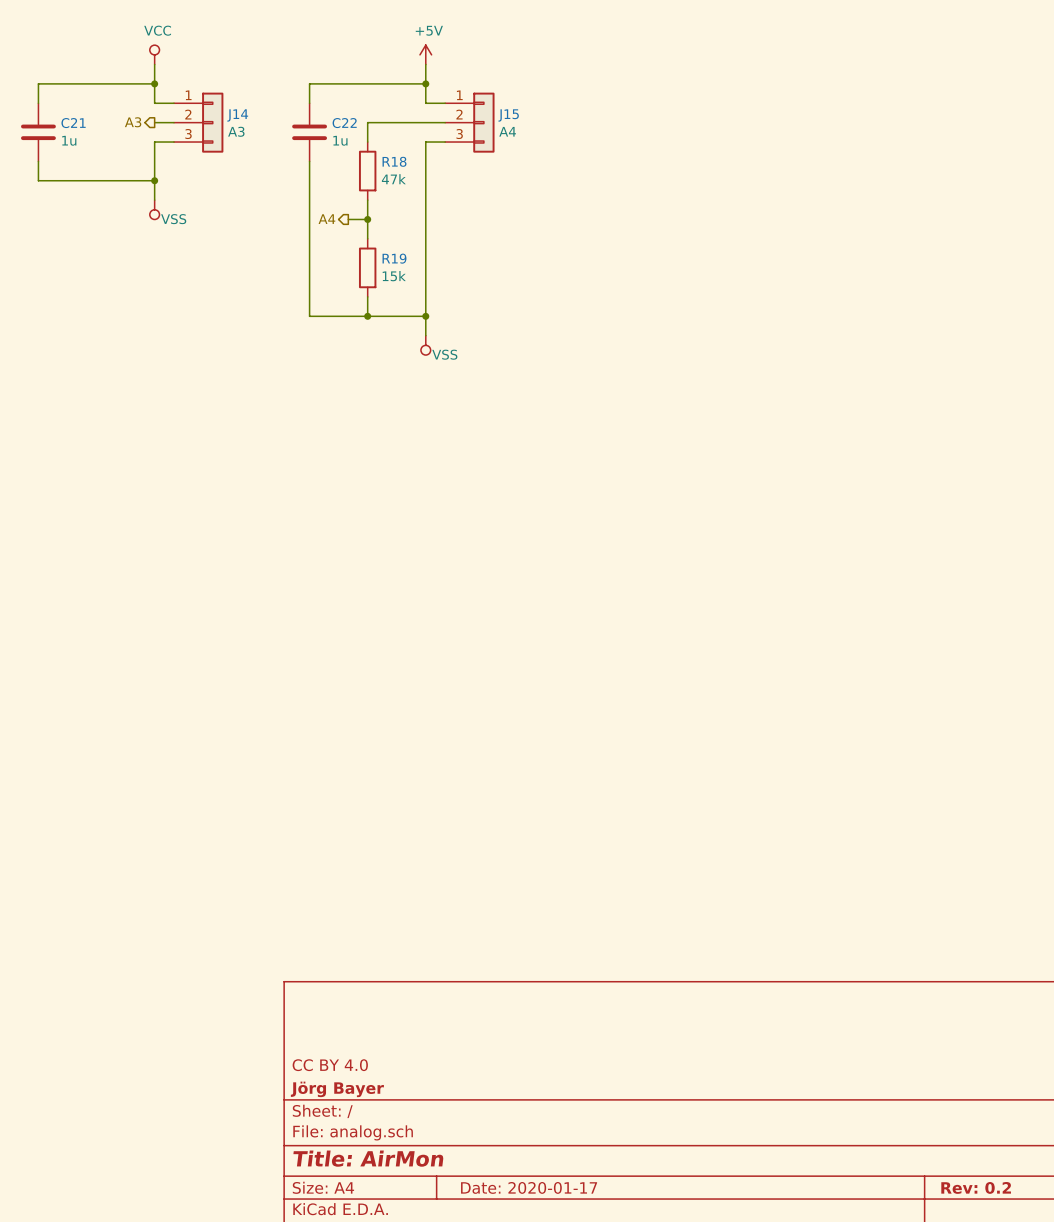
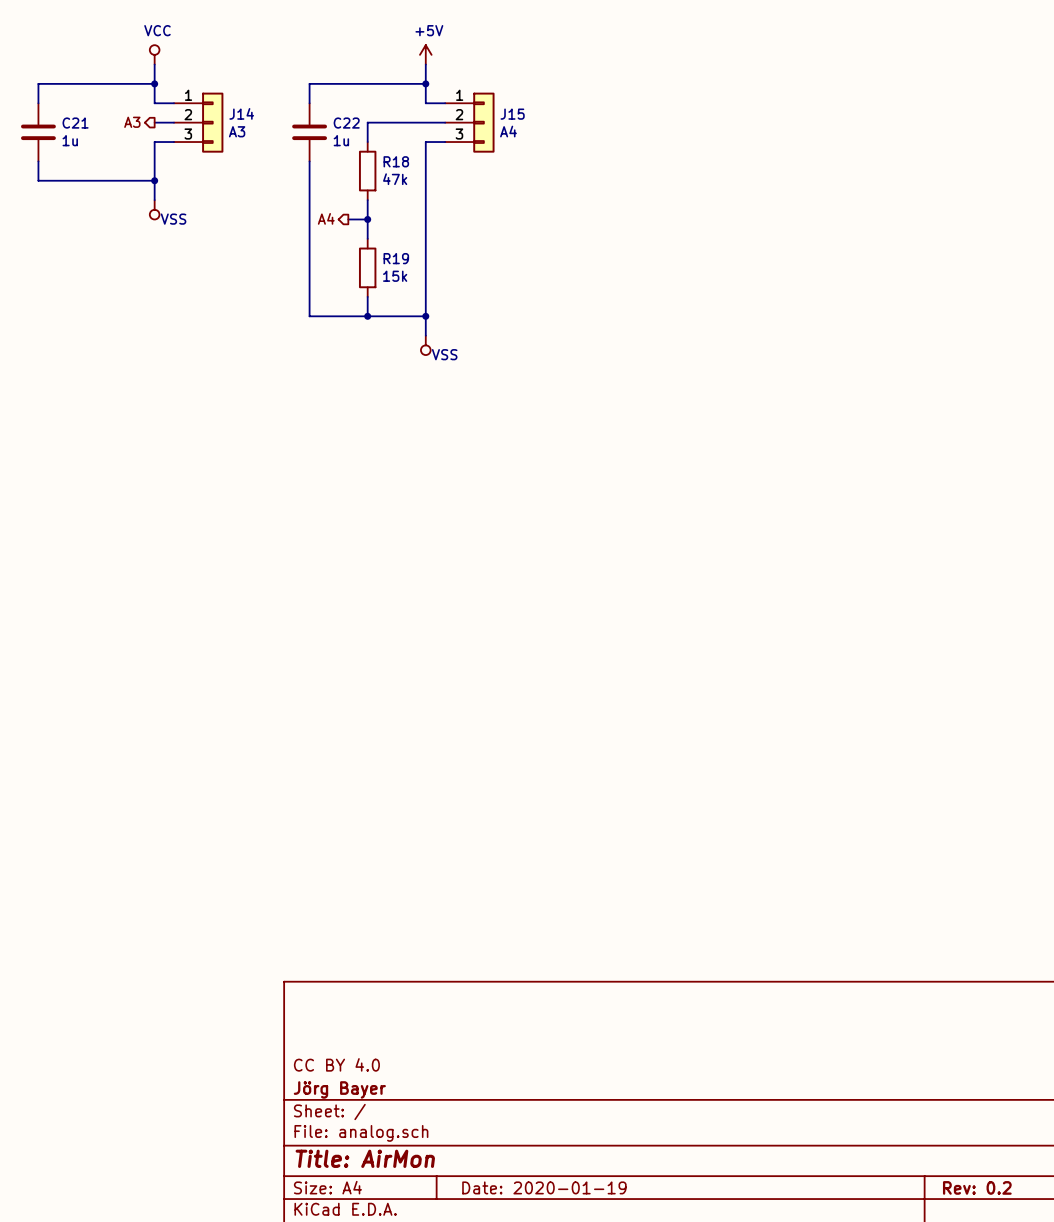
title block: Date: 2020-01-17 (529, 1187) -> Date: 2020-01-19 (544, 1187)

